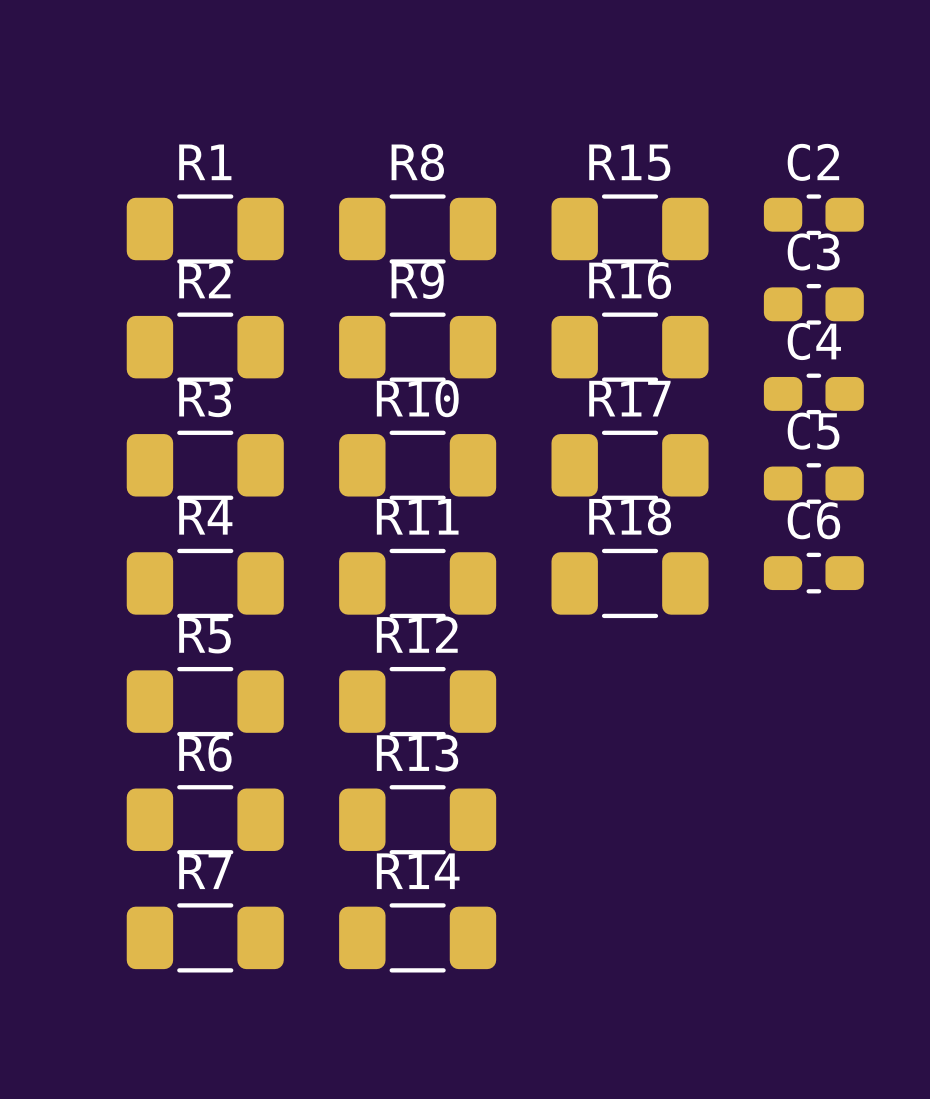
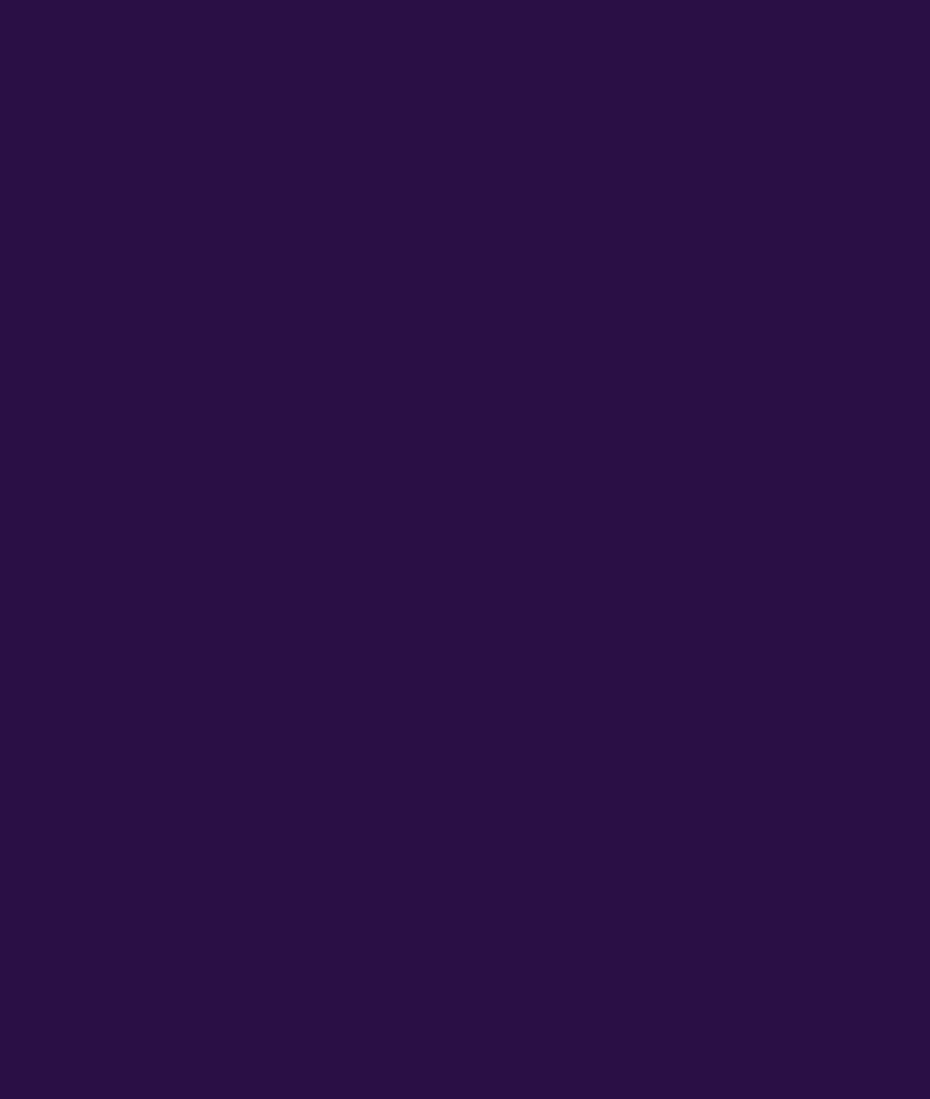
C2: (813, 214) -> none
R1: (205, 229) -> none
R8: (417, 229) -> none
R15: (630, 229) -> none
C3: (813, 304) -> none
R2: (205, 347) -> none
R9: (417, 347) -> none
R16: (630, 347) -> none
C4: (813, 393) -> none
R3: (205, 465) -> none
R10: (417, 465) -> none
R17: (630, 465) -> none
C5: (813, 483) -> none
C6: (813, 573) -> none
R4: (205, 583) -> none
R11: (417, 583) -> none
R18: (630, 583) -> none
R5: (205, 701) -> none
R12: (417, 701) -> none
R6: (205, 819) -> none
R13: (417, 819) -> none
R7: (205, 937) -> none
R14: (417, 937) -> none

